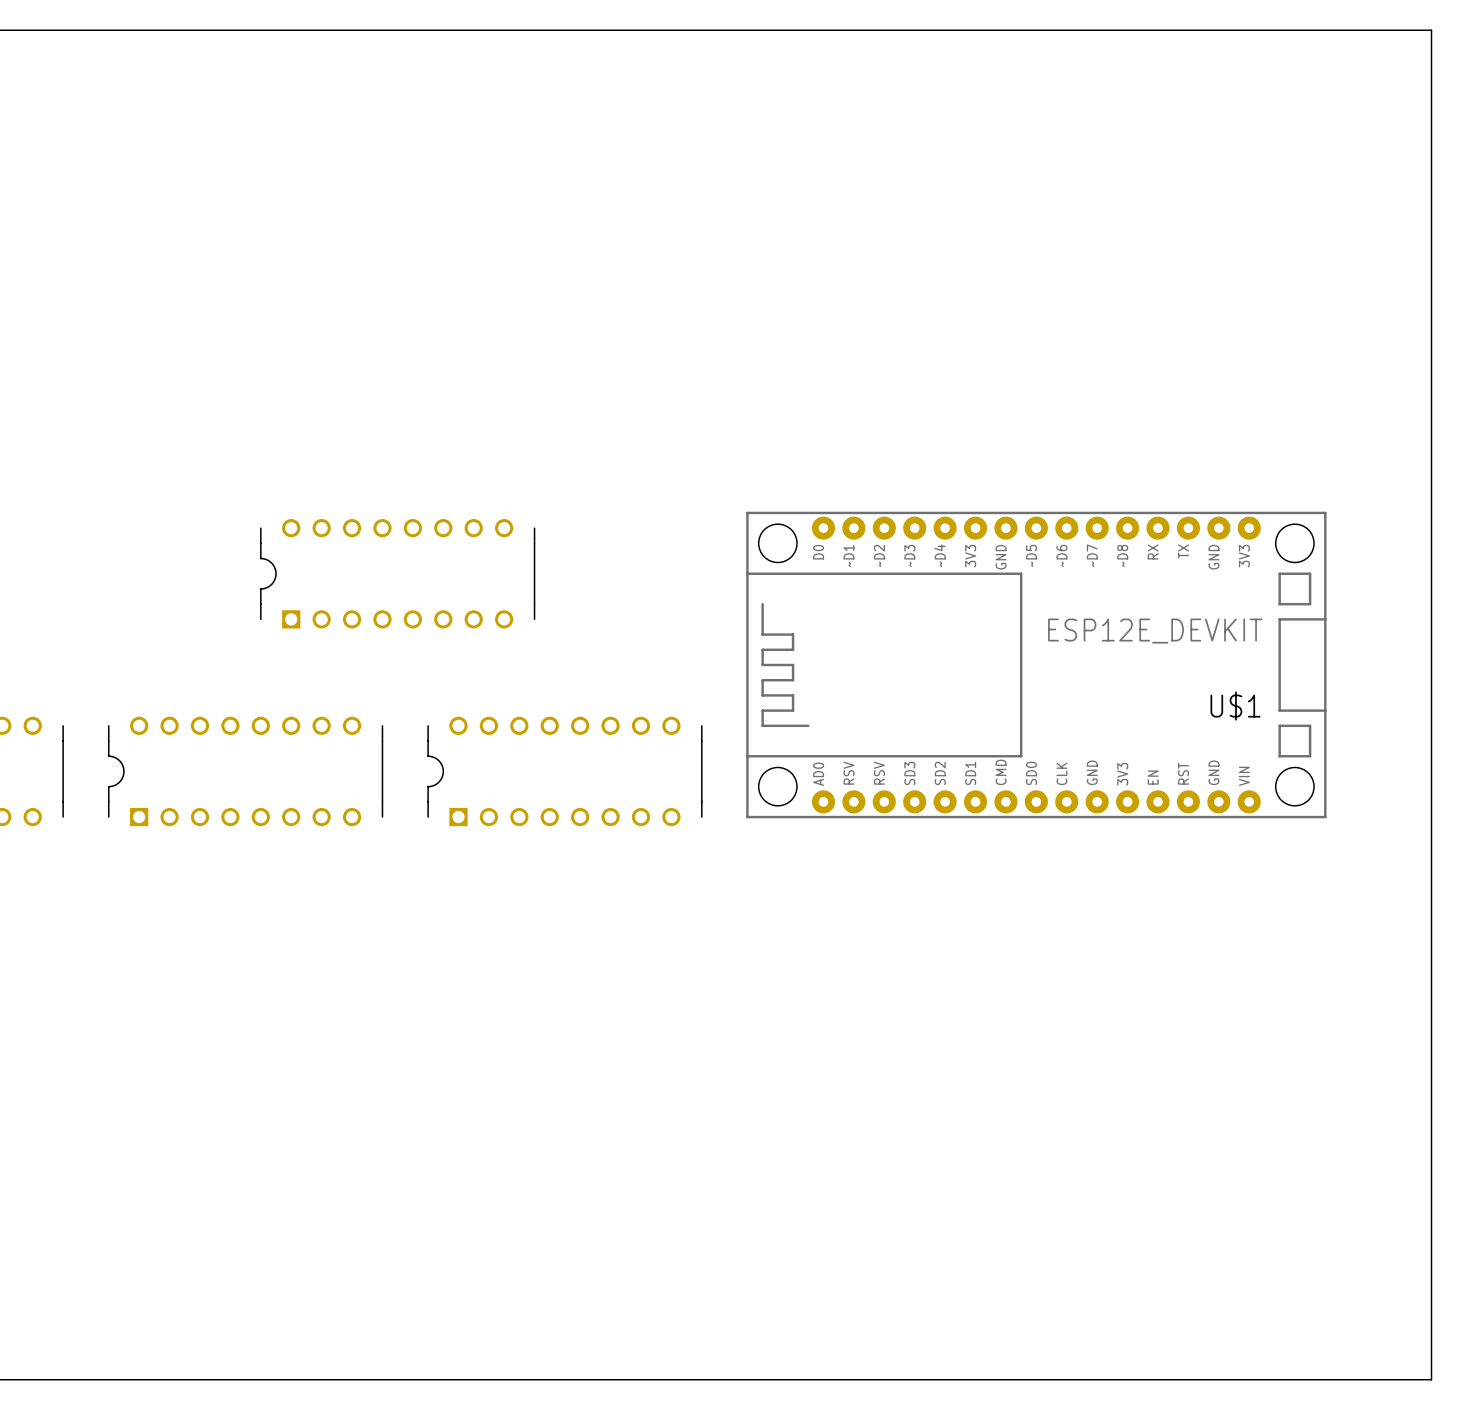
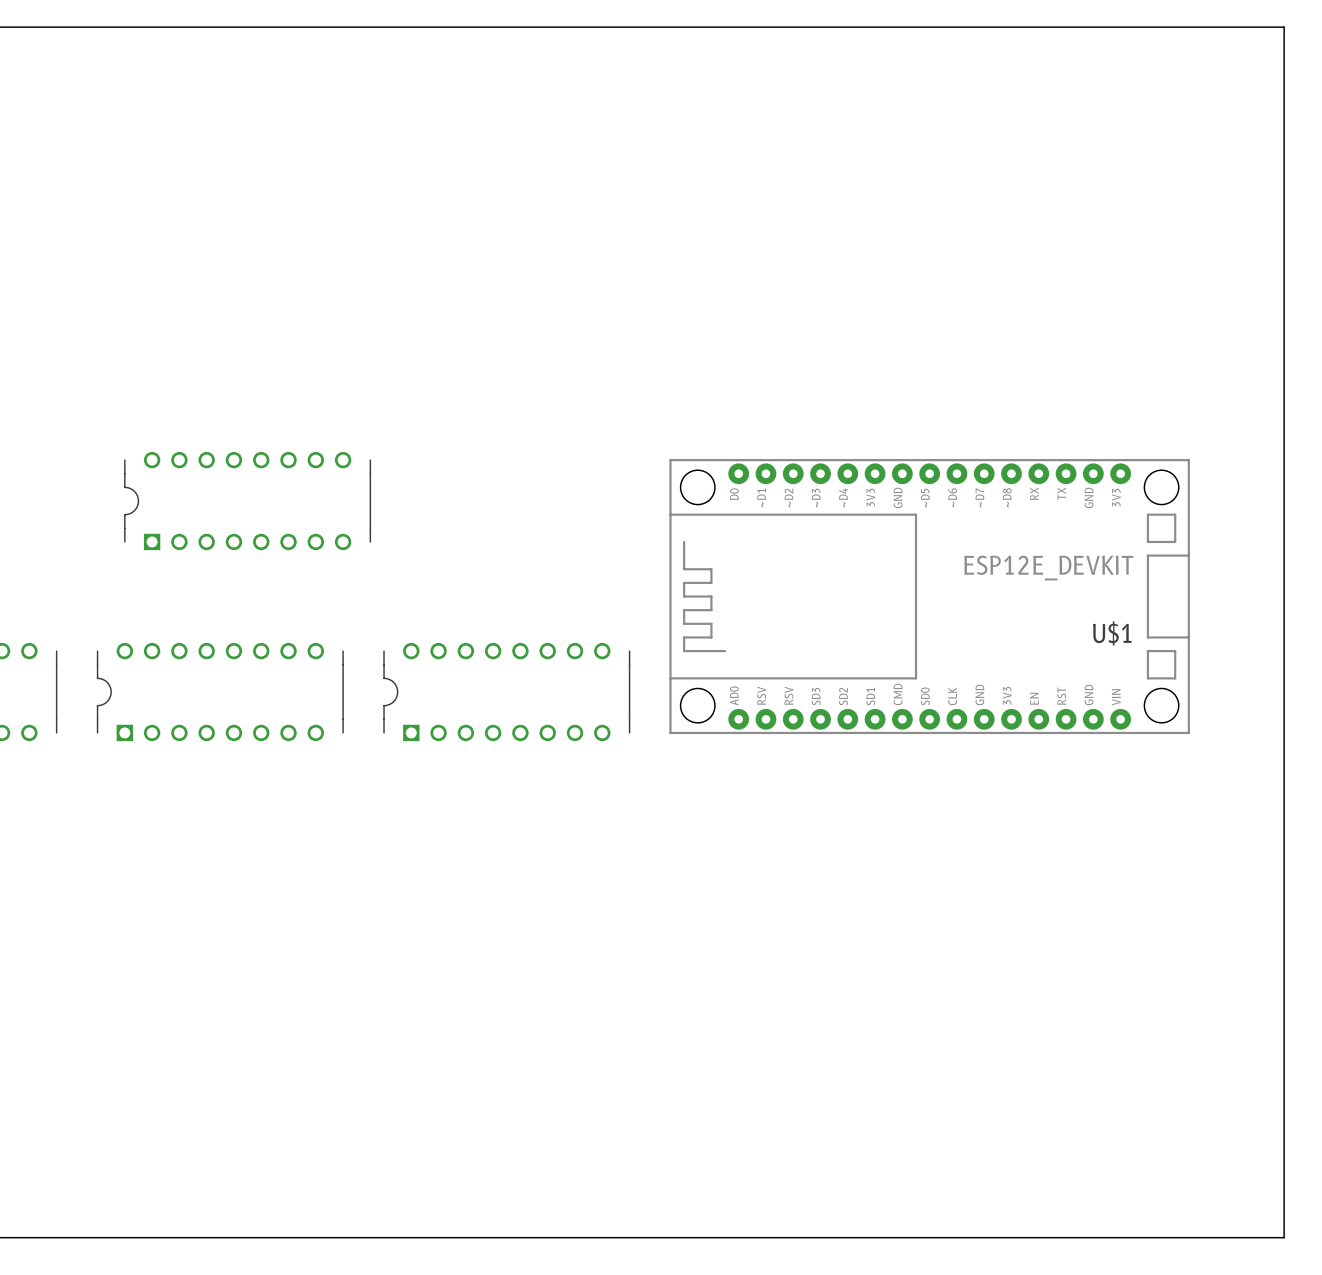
part position: (397, 573) -> (247, 501)

